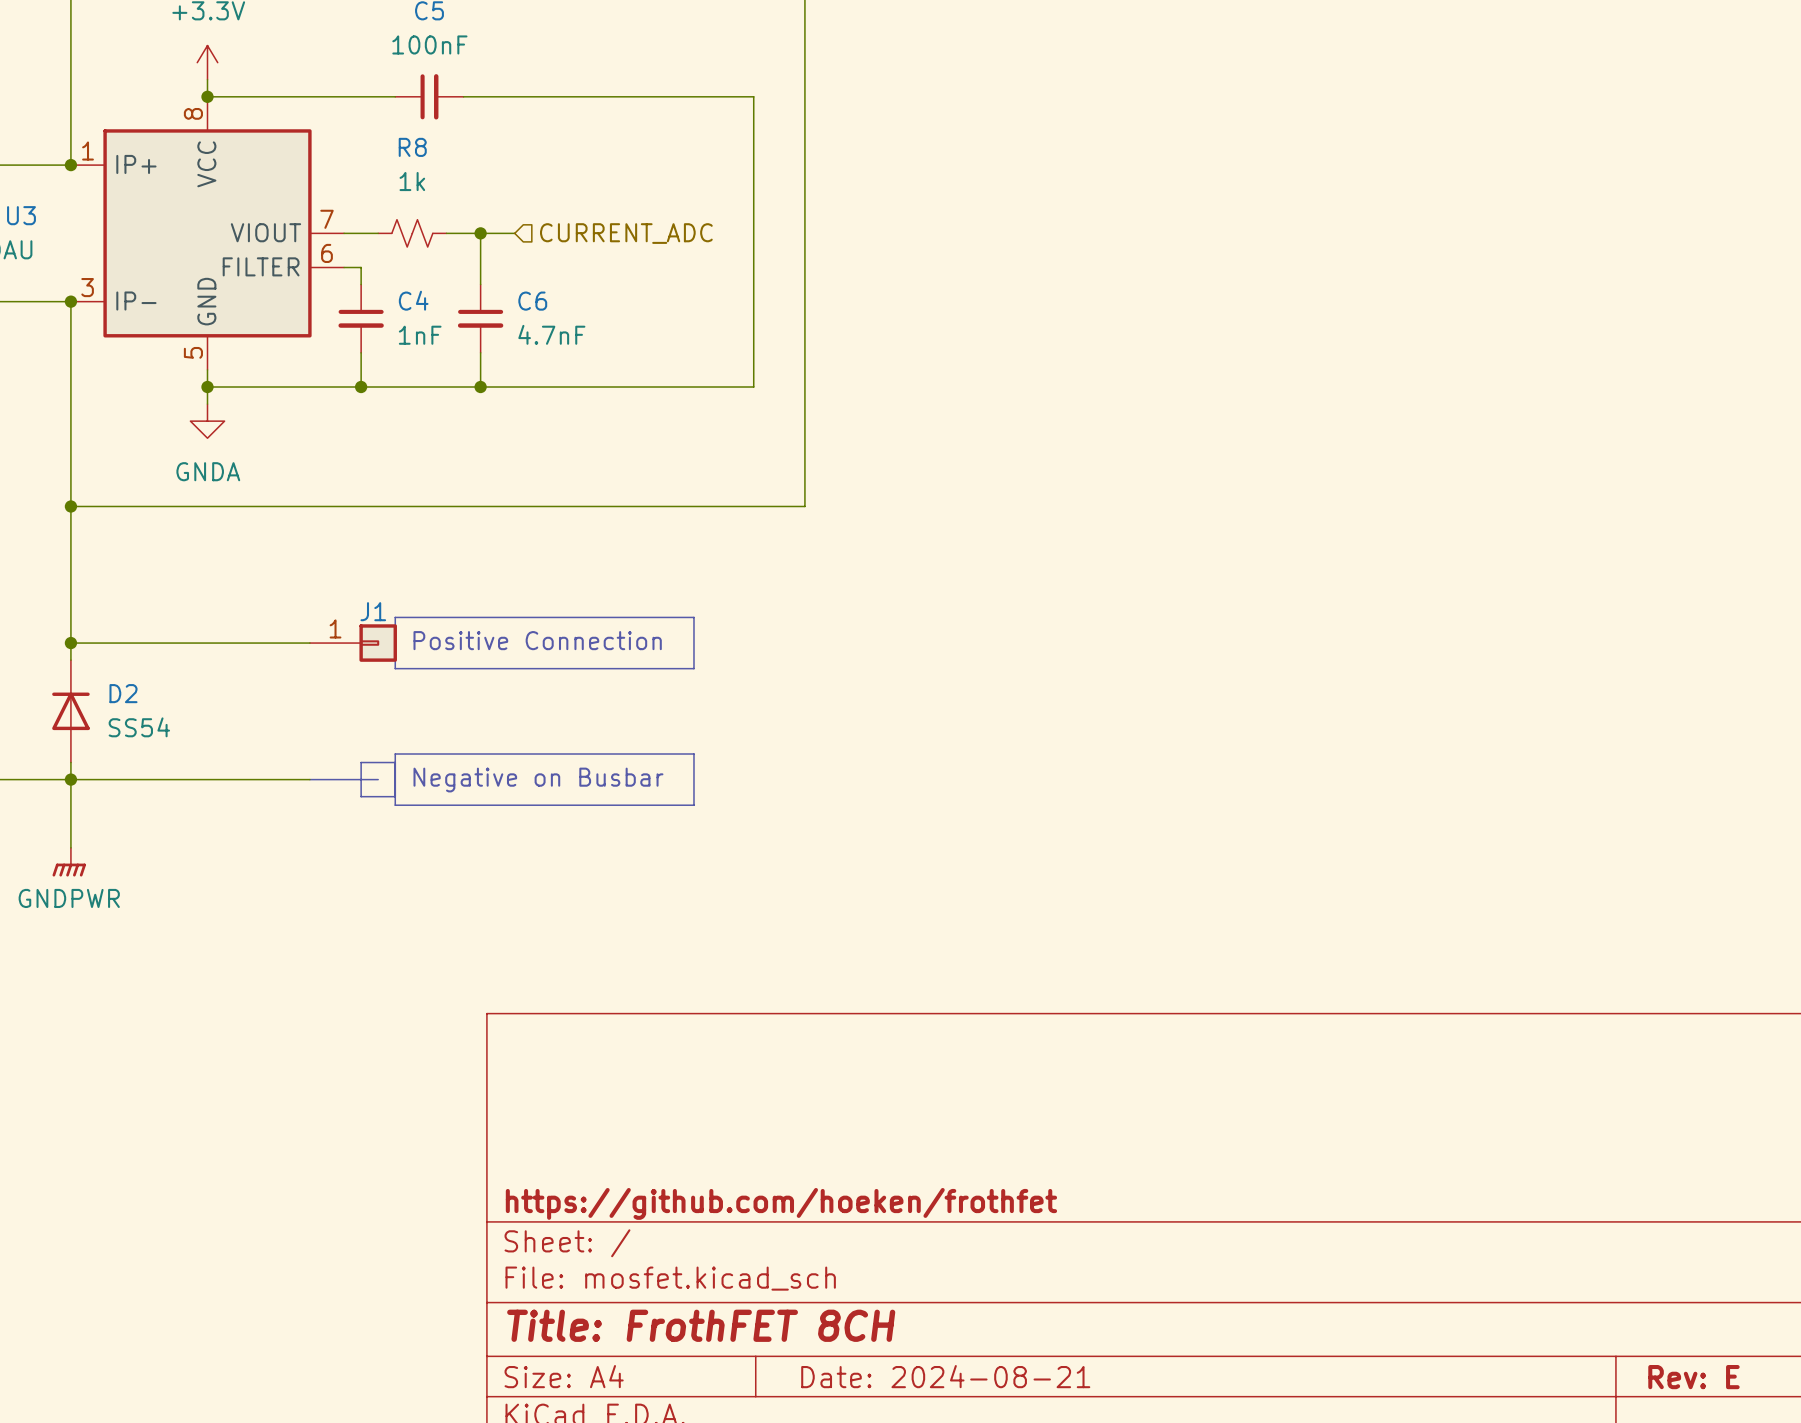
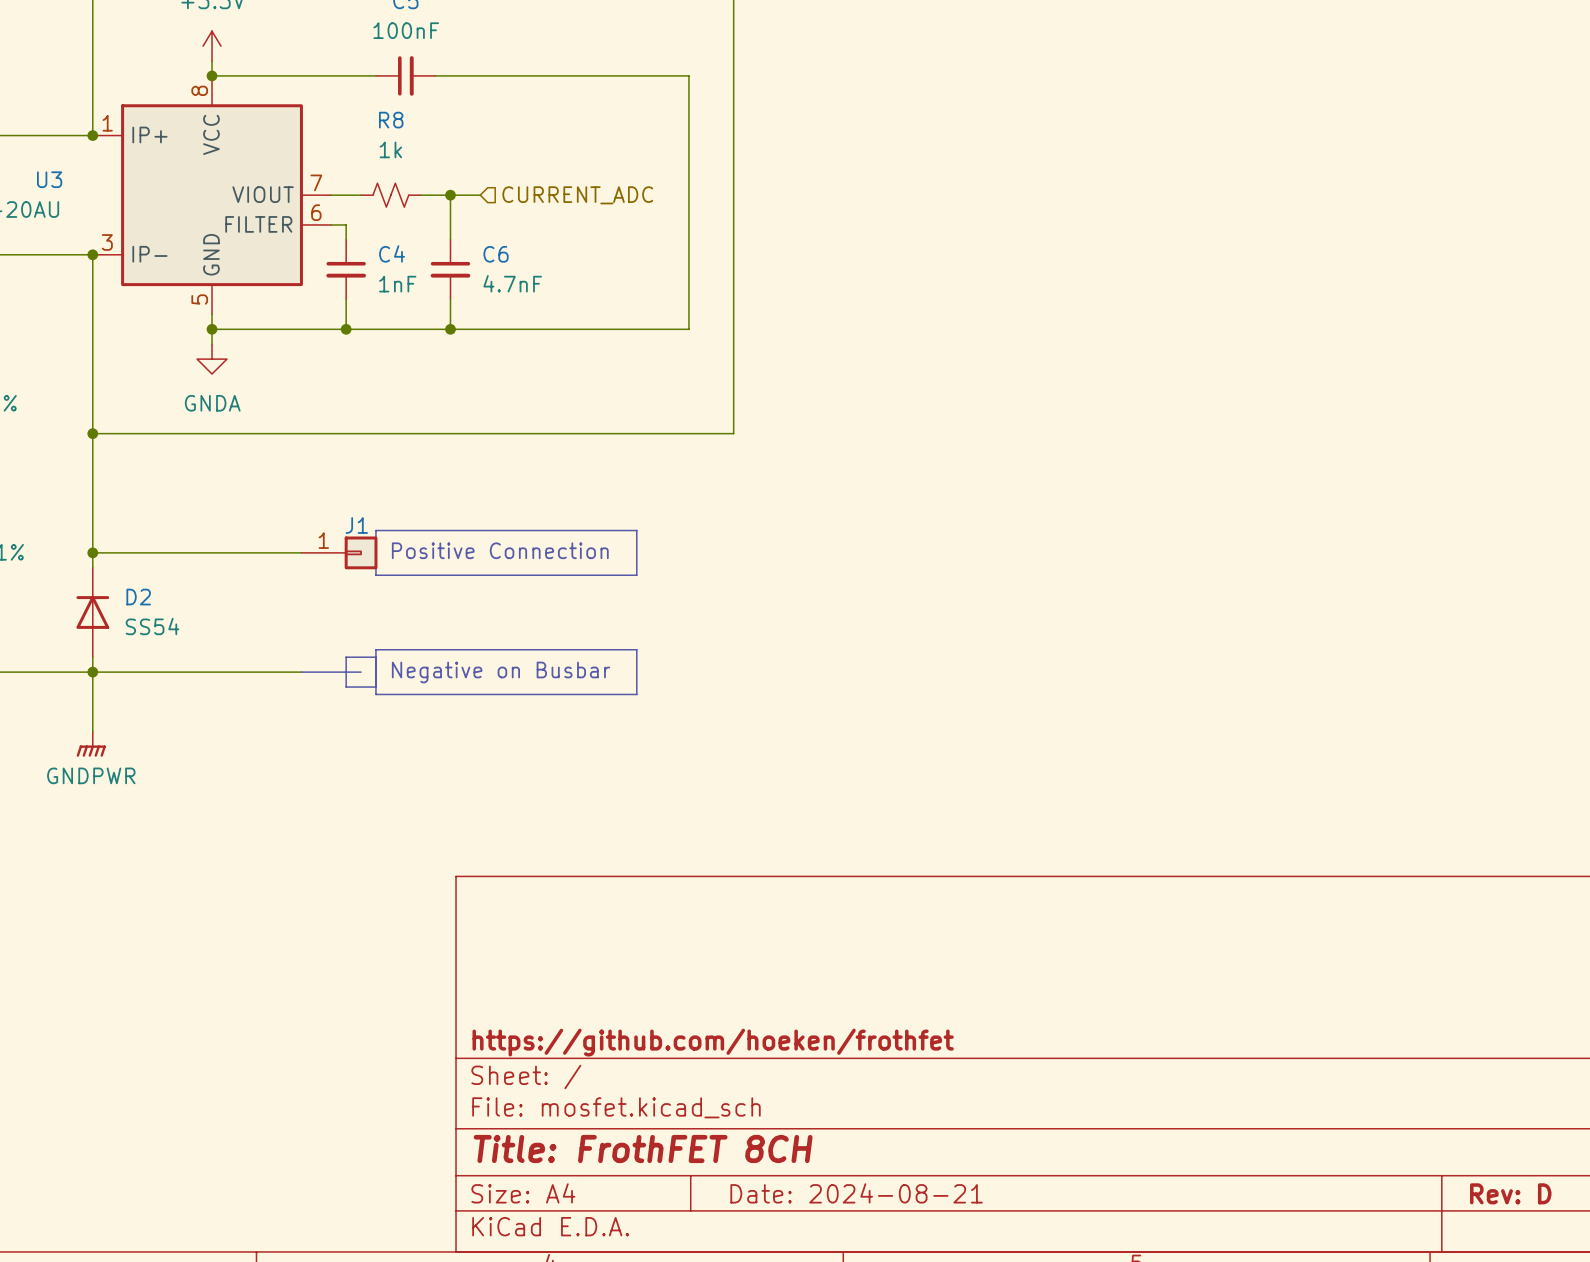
title block: Rev: E (1693, 1377) -> Rev: D (1510, 1193)

